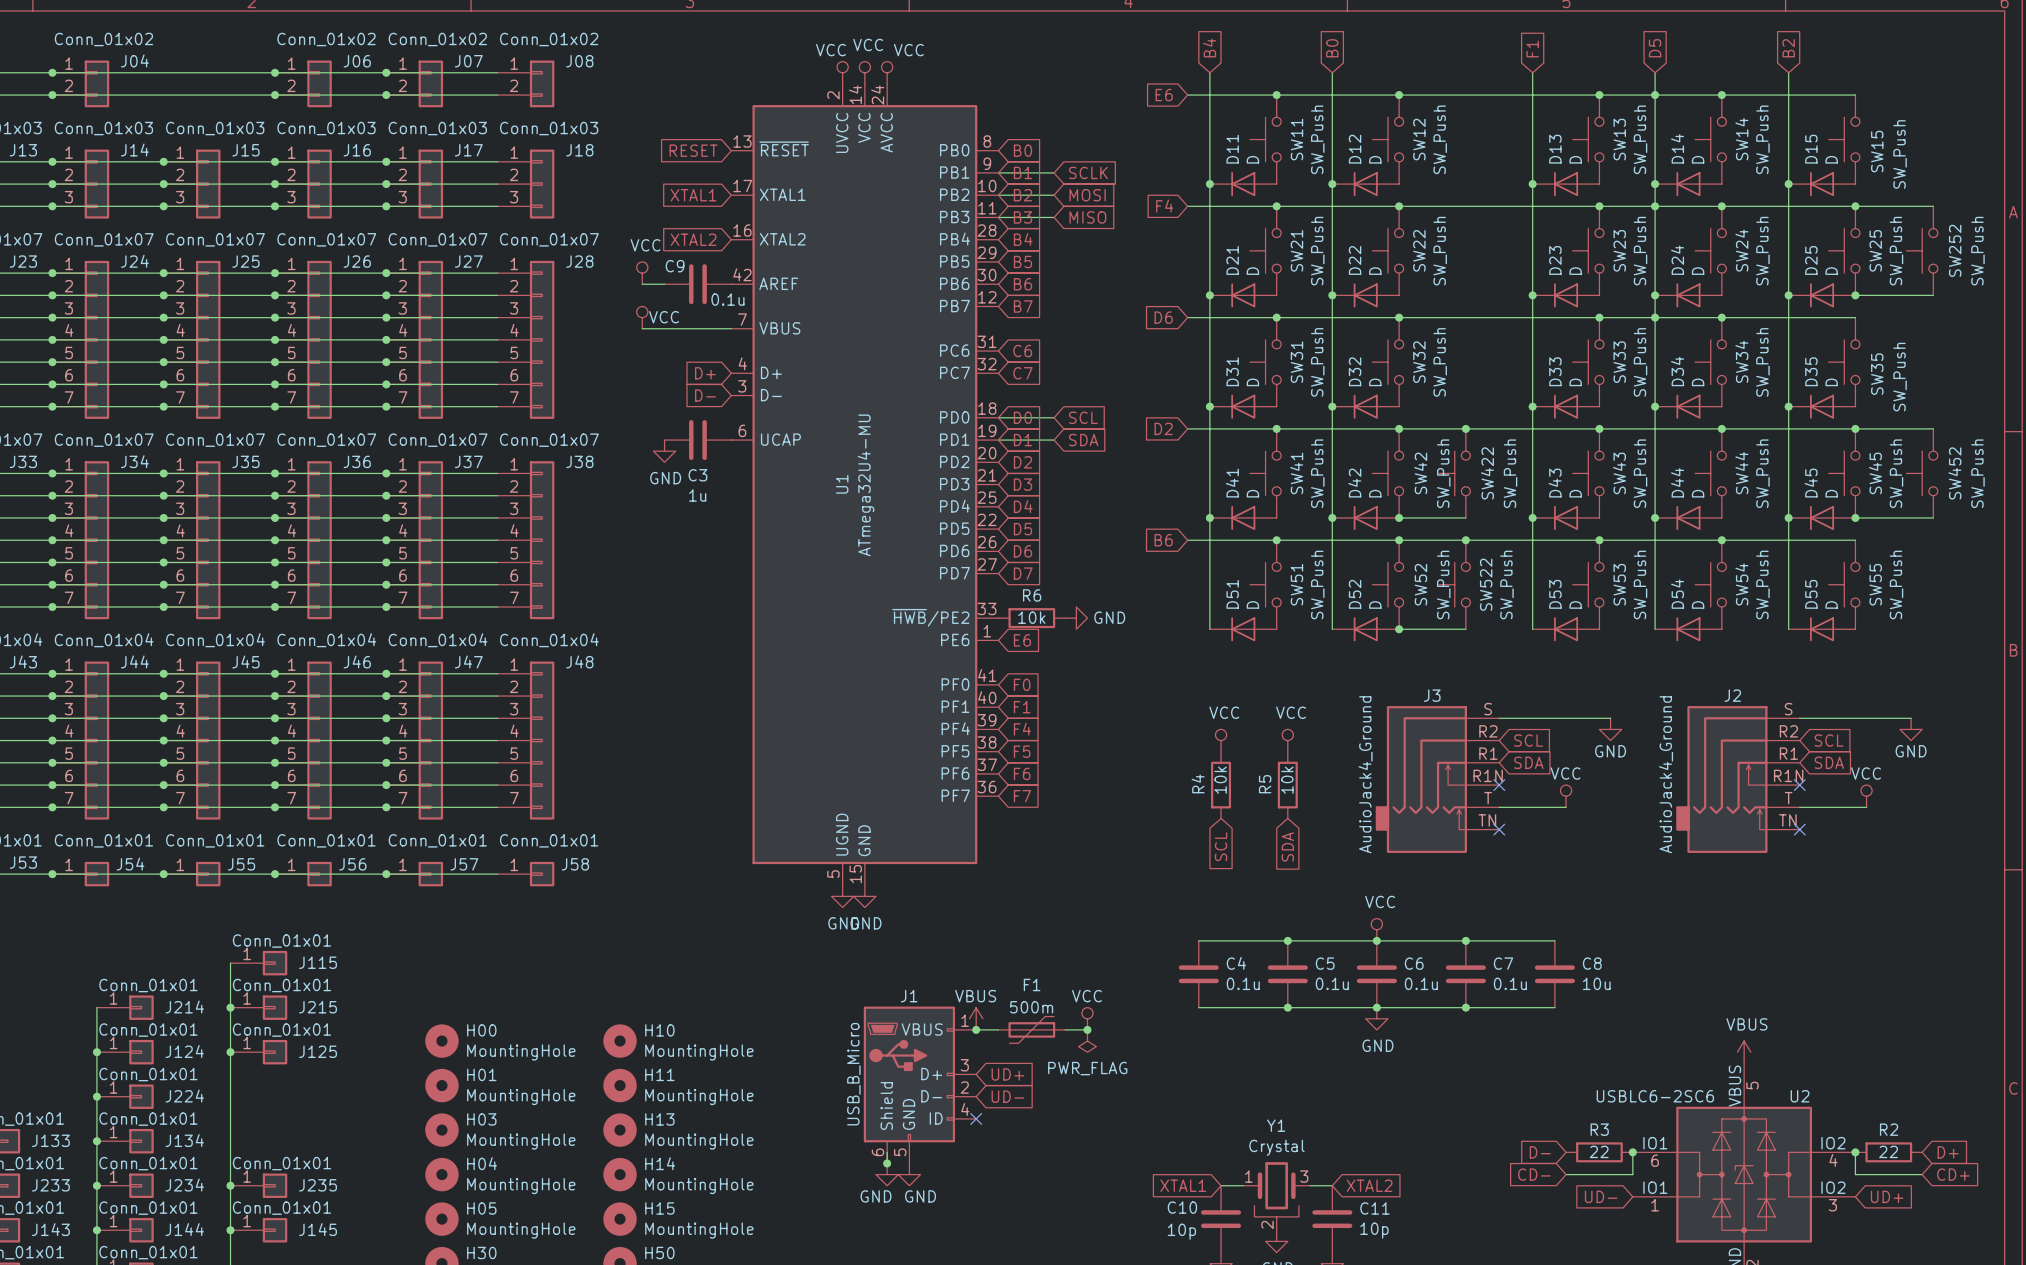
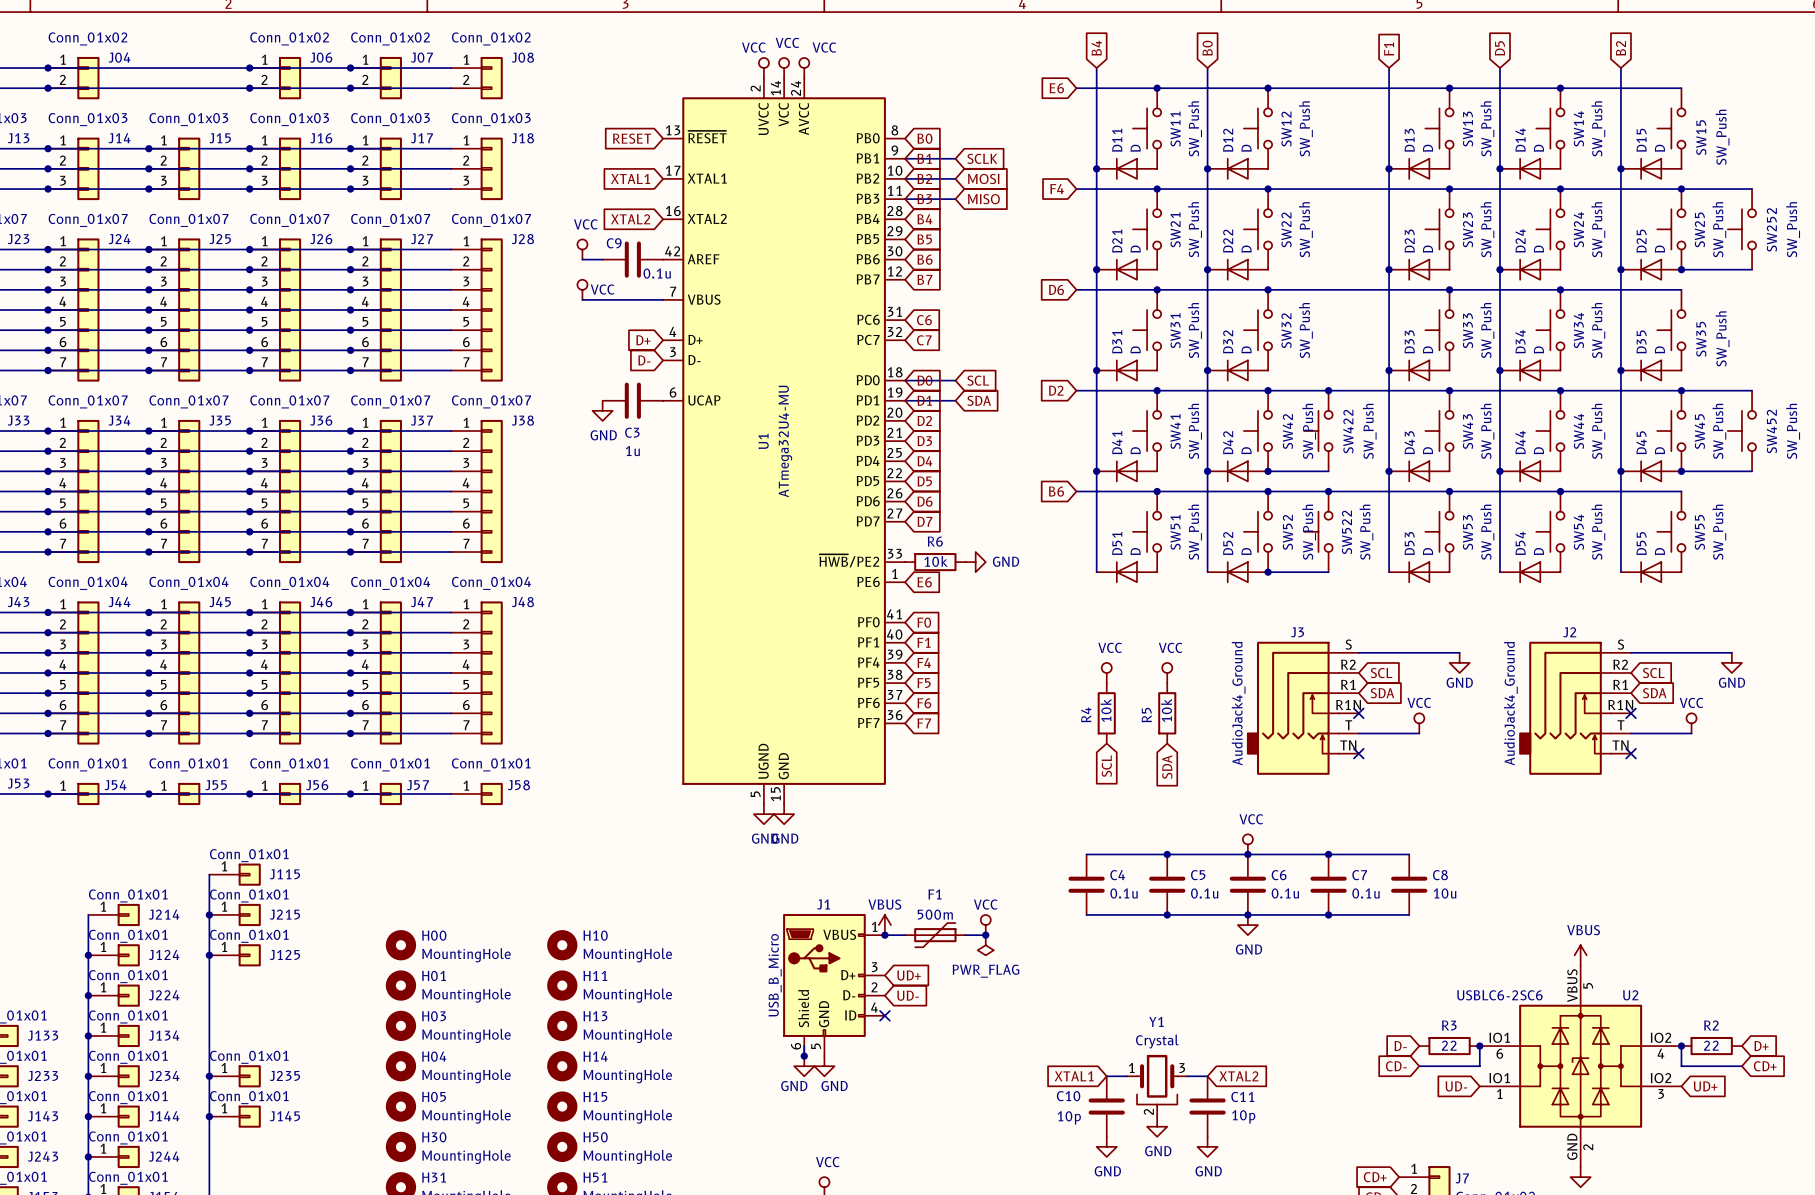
junction: (1655, 95) -> none
junction: (1655, 206) -> none
junction: (1655, 317) -> none

